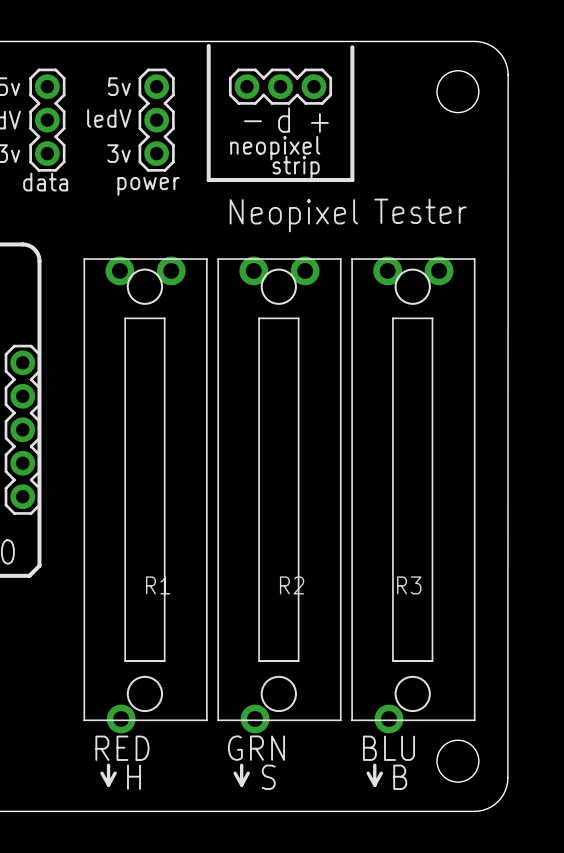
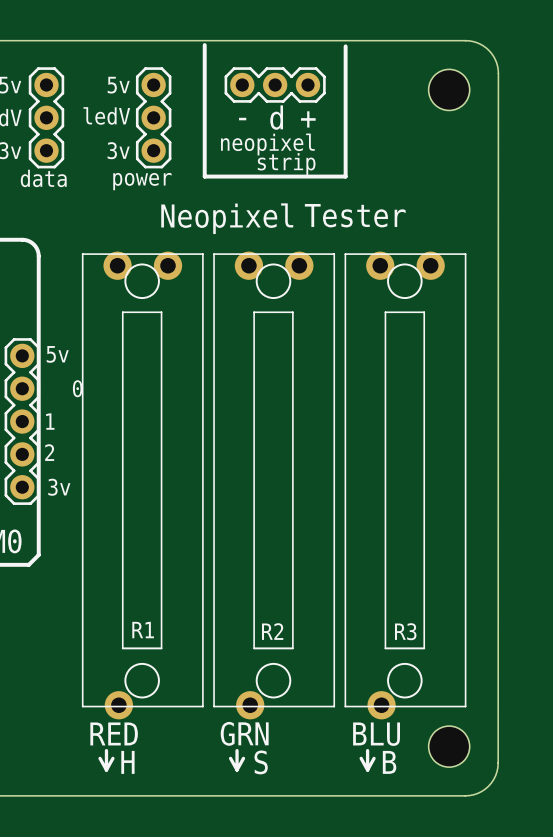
text position: Tester (420, 211) -> Tester (355, 215)
text position: Neopixel (293, 215) -> Neopixel (227, 218)
text: none -> 5v (57, 354)
text: none -> 0 (77, 388)
text: none -> 1 (50, 421)
text: none -> 2 (49, 452)
text: none -> 3v (59, 487)
R1 name position: R1 (158, 585) -> R1 (143, 630)
R2 name position: R2 (292, 585) -> R2 (272, 631)
R3 name position: R3 (409, 585) -> R3 (405, 631)

